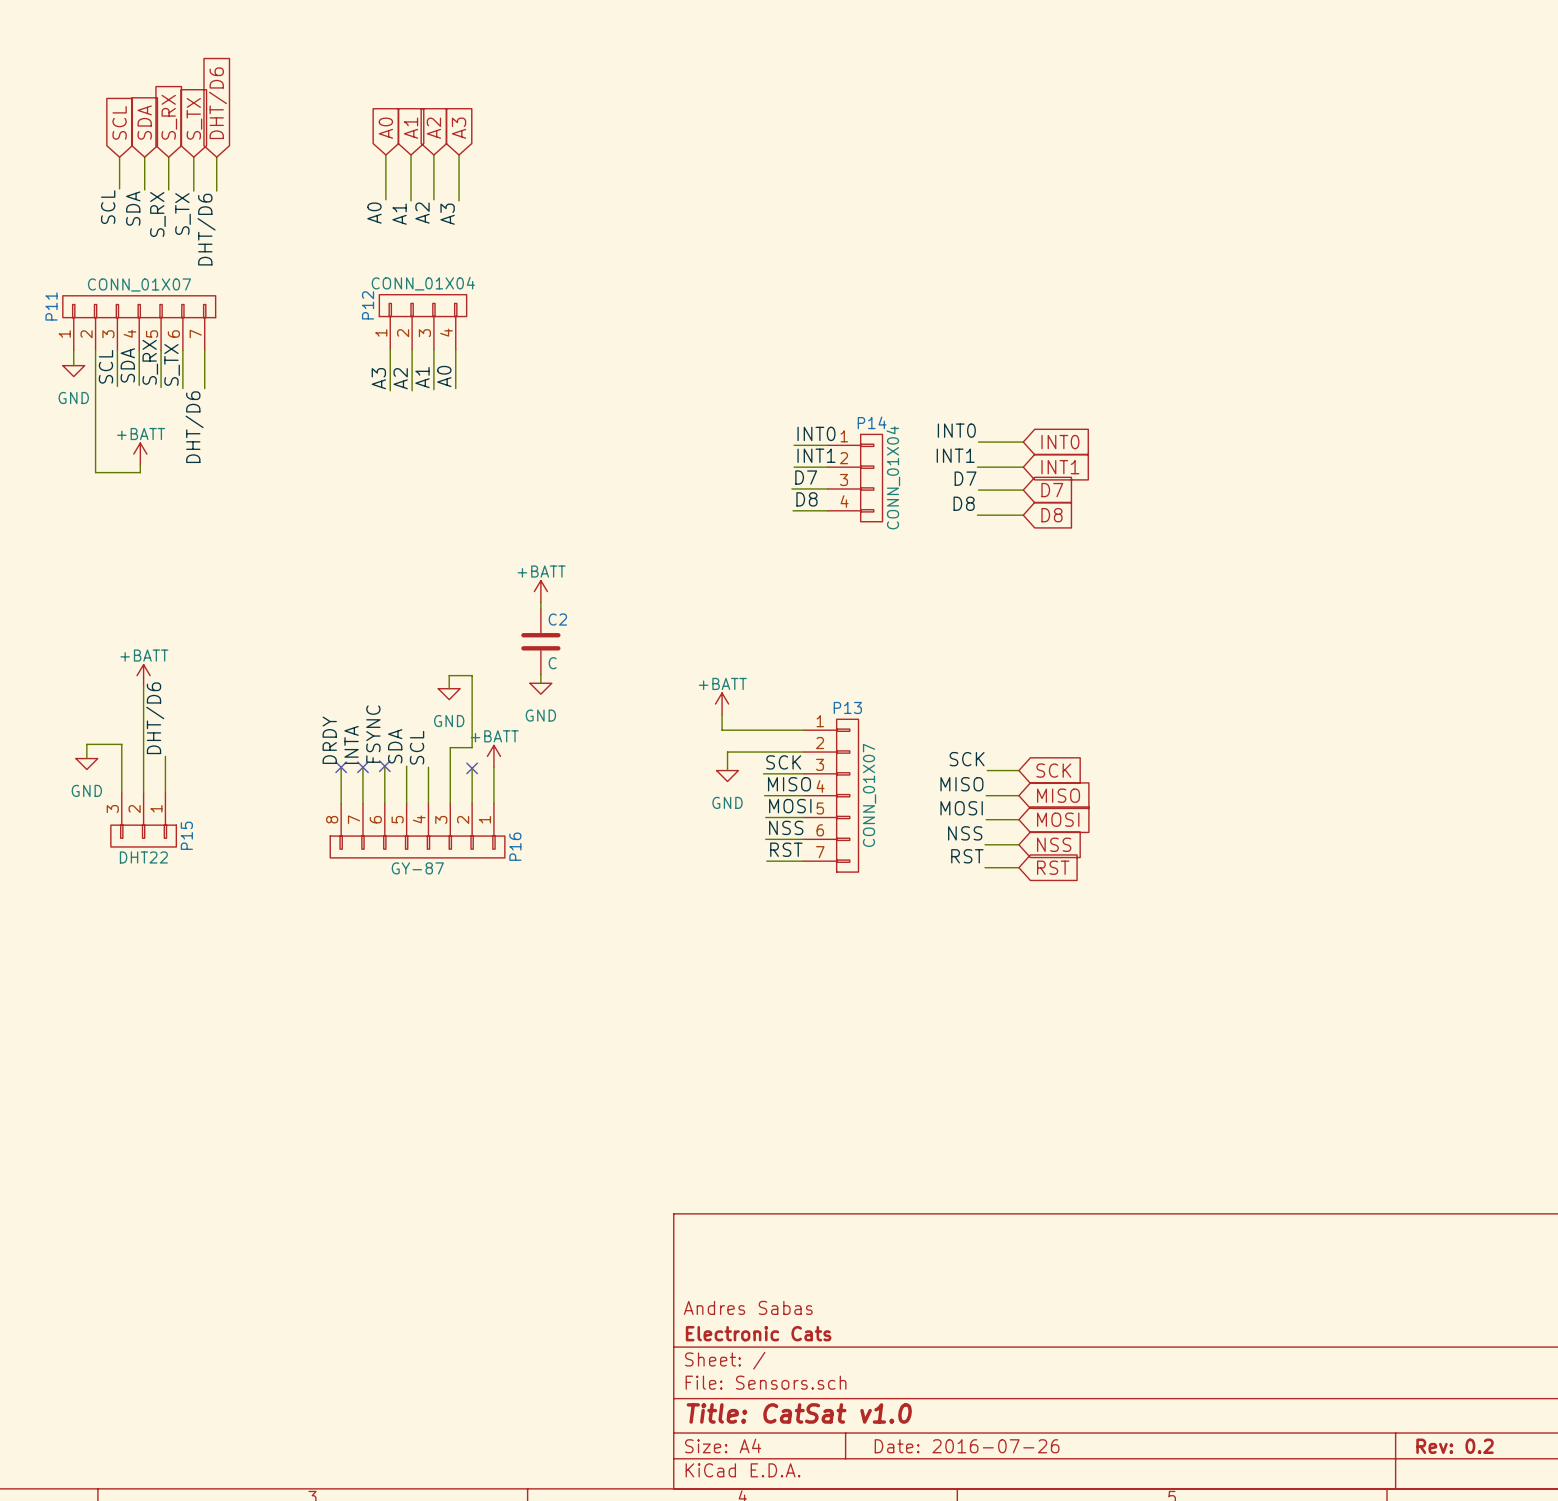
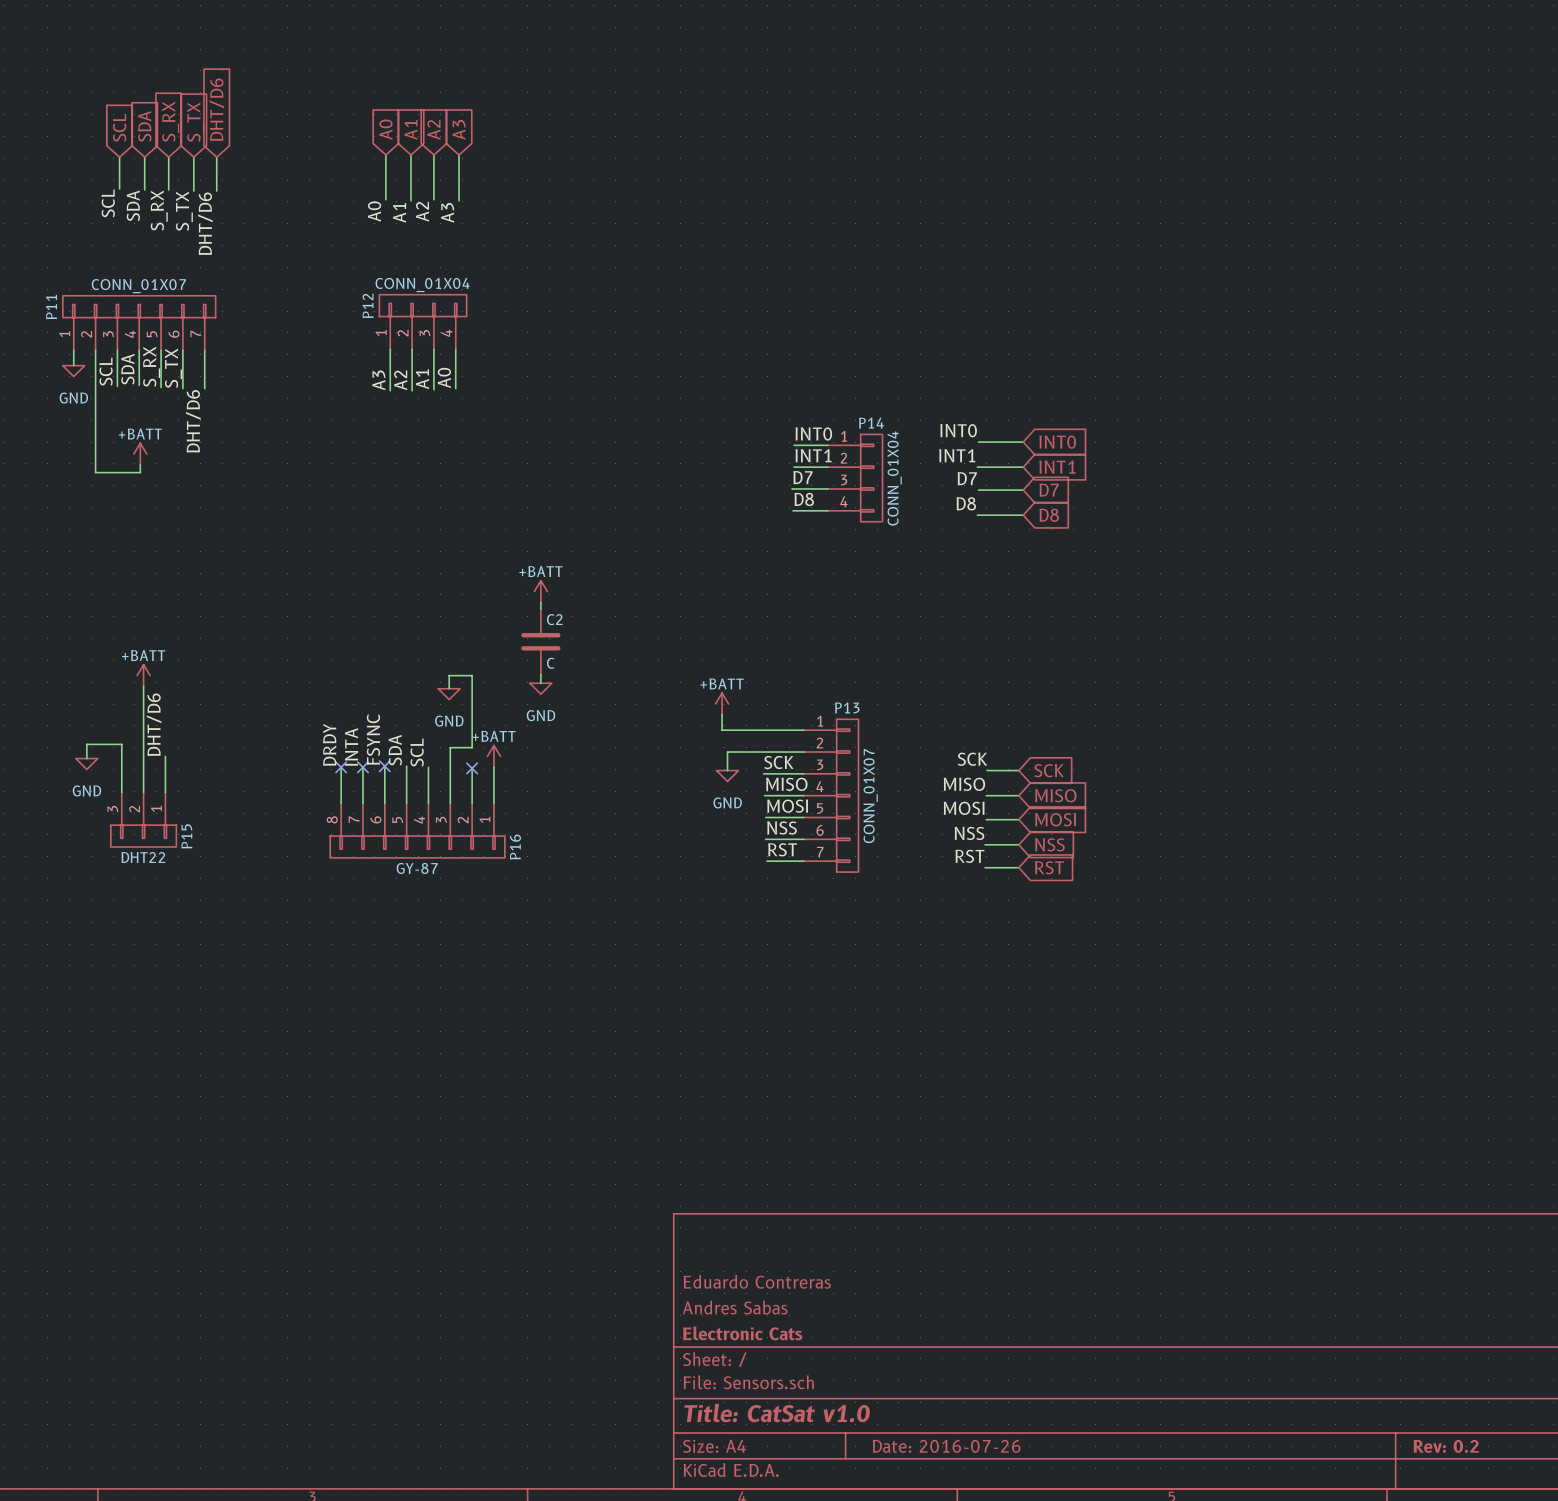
title block: none -> Eduardo Contreras (757, 1281)

